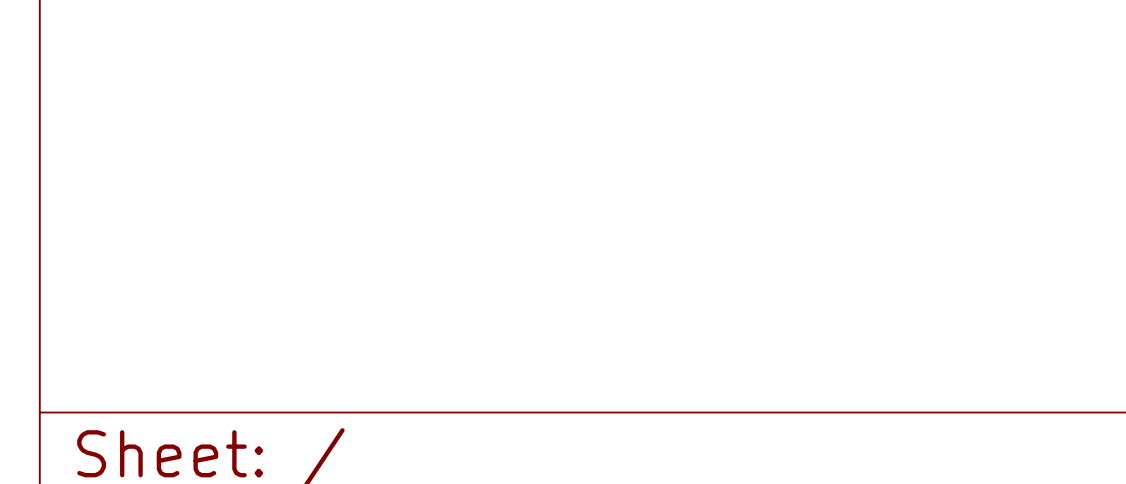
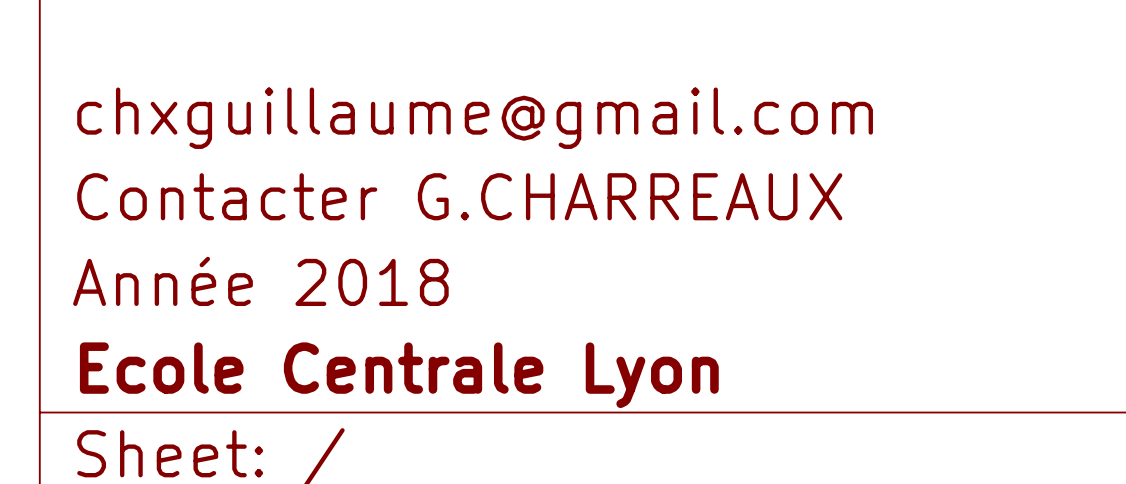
title block: none -> chxguillaume@gmail.com (475, 118)
title block: none -> Contacter G.CHARREAUX (459, 196)
title block: none -> Année 2018 (260, 281)
title block: none -> Ecole Centrale Lyon (399, 375)

